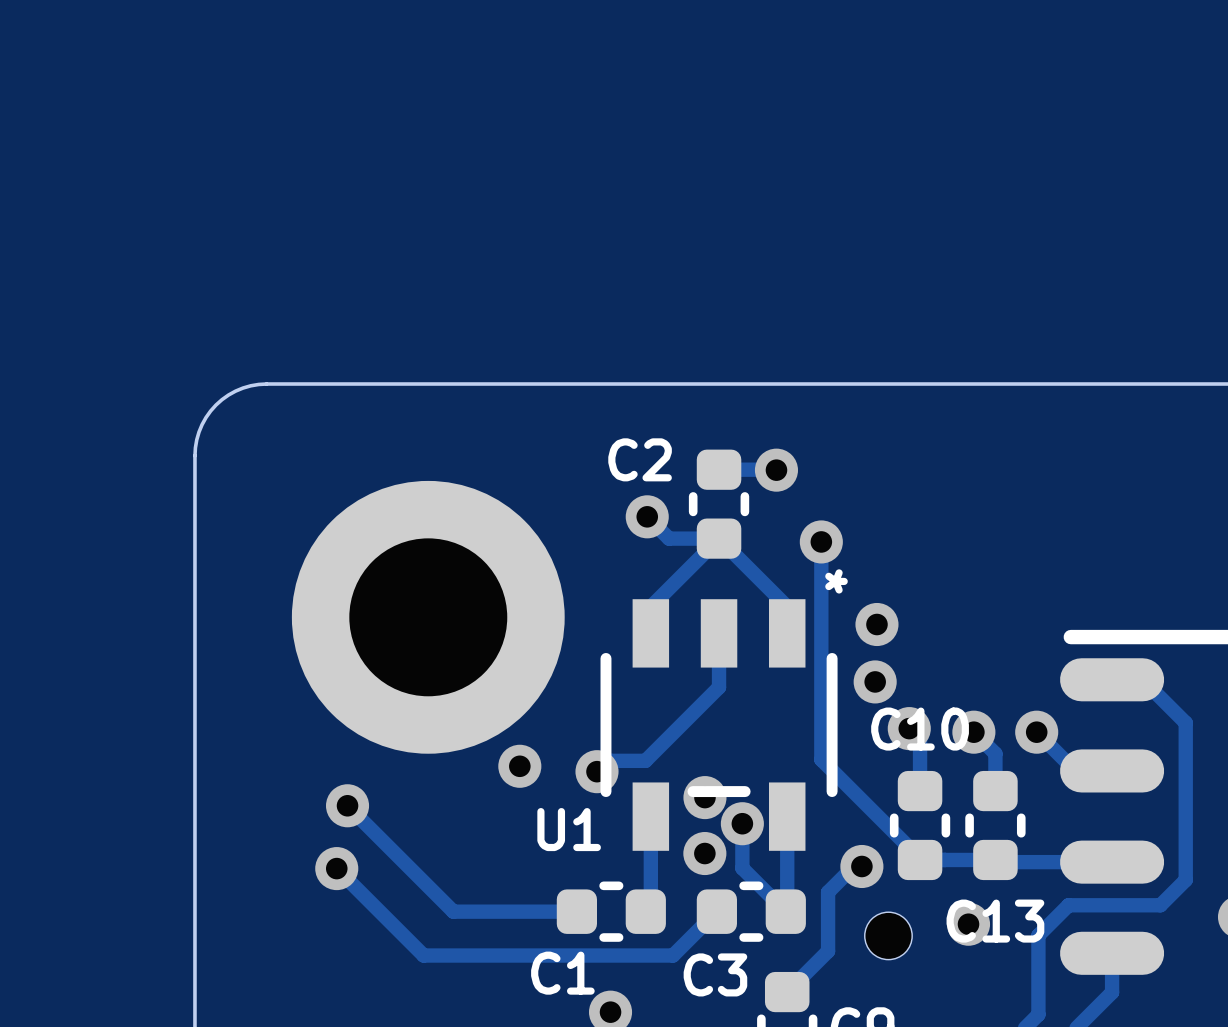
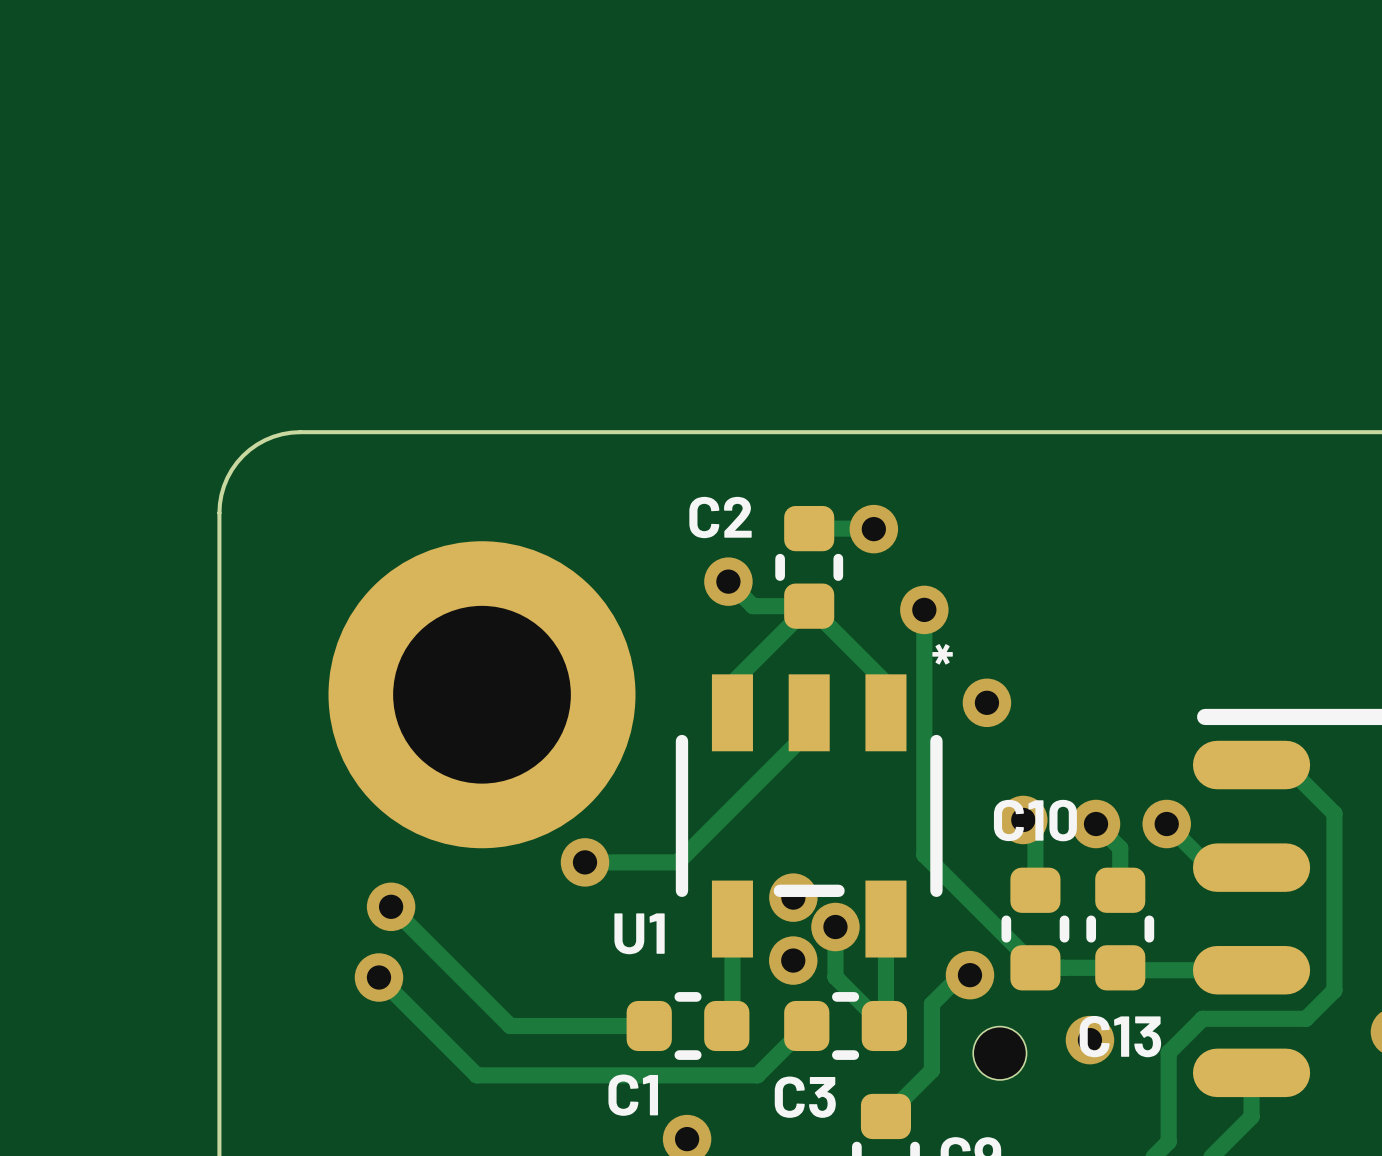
track: (719, 649) (719, 687) (645, 760) (610, 760) (610, 771) (596, 771) -> (809, 731) (677, 862) (585, 862)
via: (875, 681) -> none
via: (596, 771) -> none

